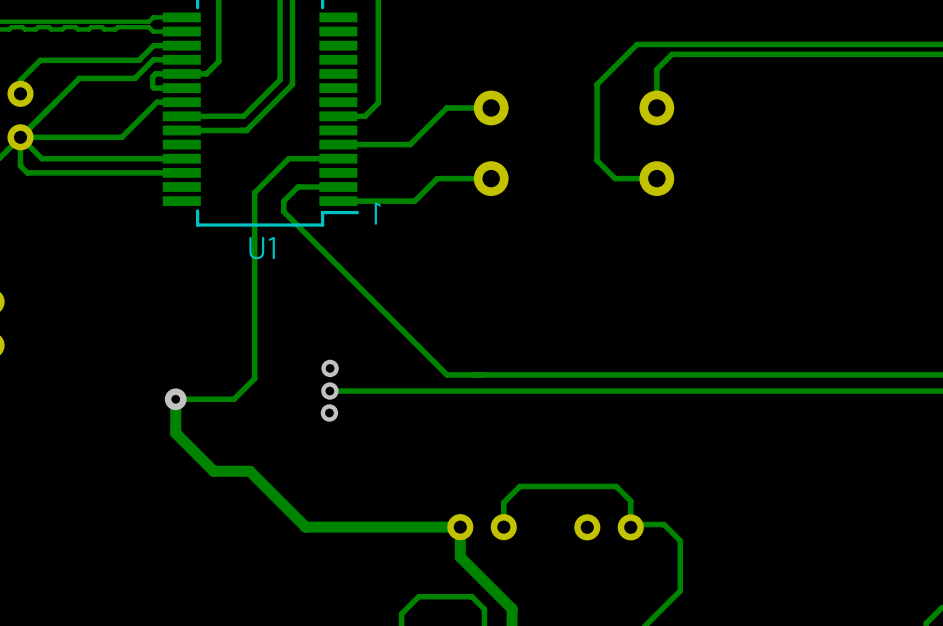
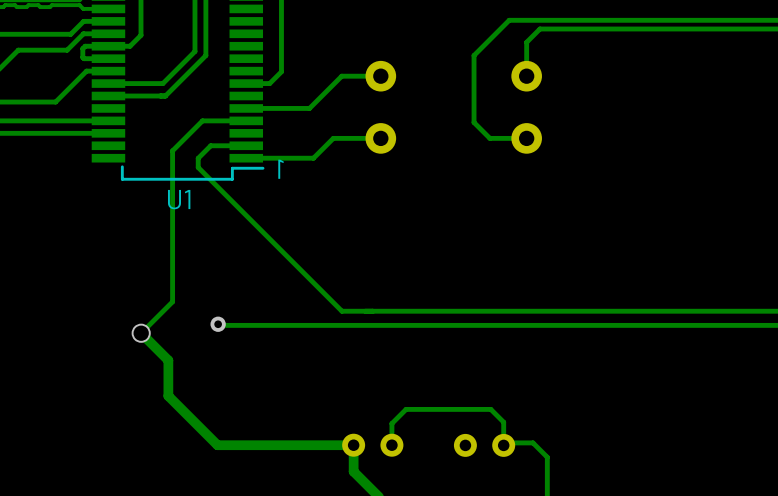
track: (254, 364) (254, 378) (234, 399) (175, 399) (175, 433) (213, 471) (249, 471) -> (172, 301) (141, 333) (168, 360) (168, 396)
via: (330, 368) -> none
track: none -> (218, 324) (238, 325)
via: none -> (218, 324)
via: (329, 391) -> none
via: (175, 399) -> none
via: none -> (141, 333)
via: (329, 412) -> none

